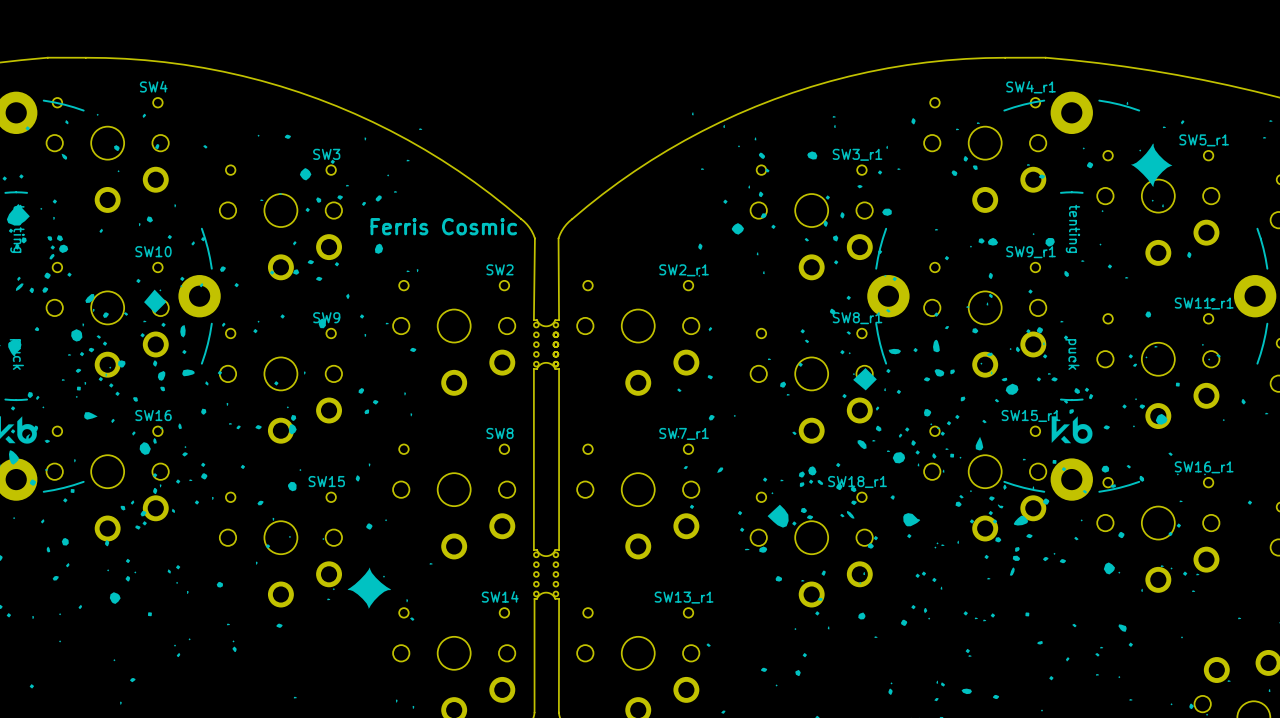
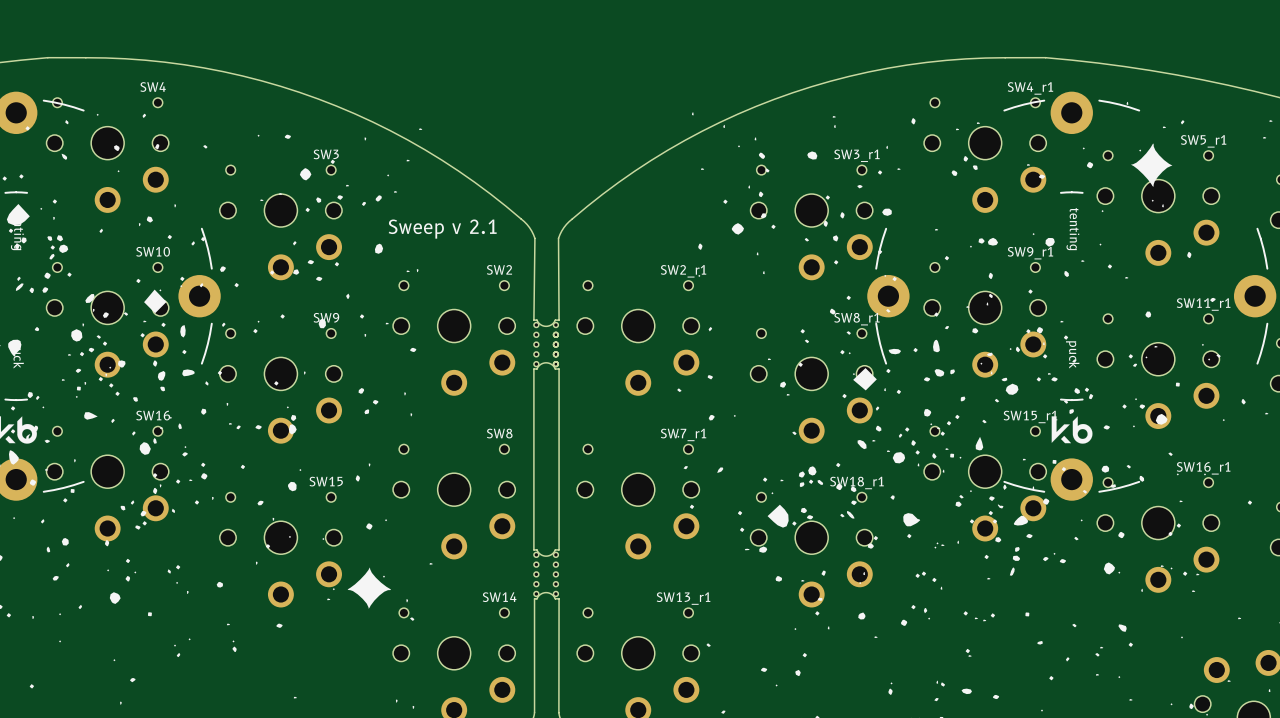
text: Ferris Cosmic (443, 226) -> Sweep v 2.1 (442, 229)

